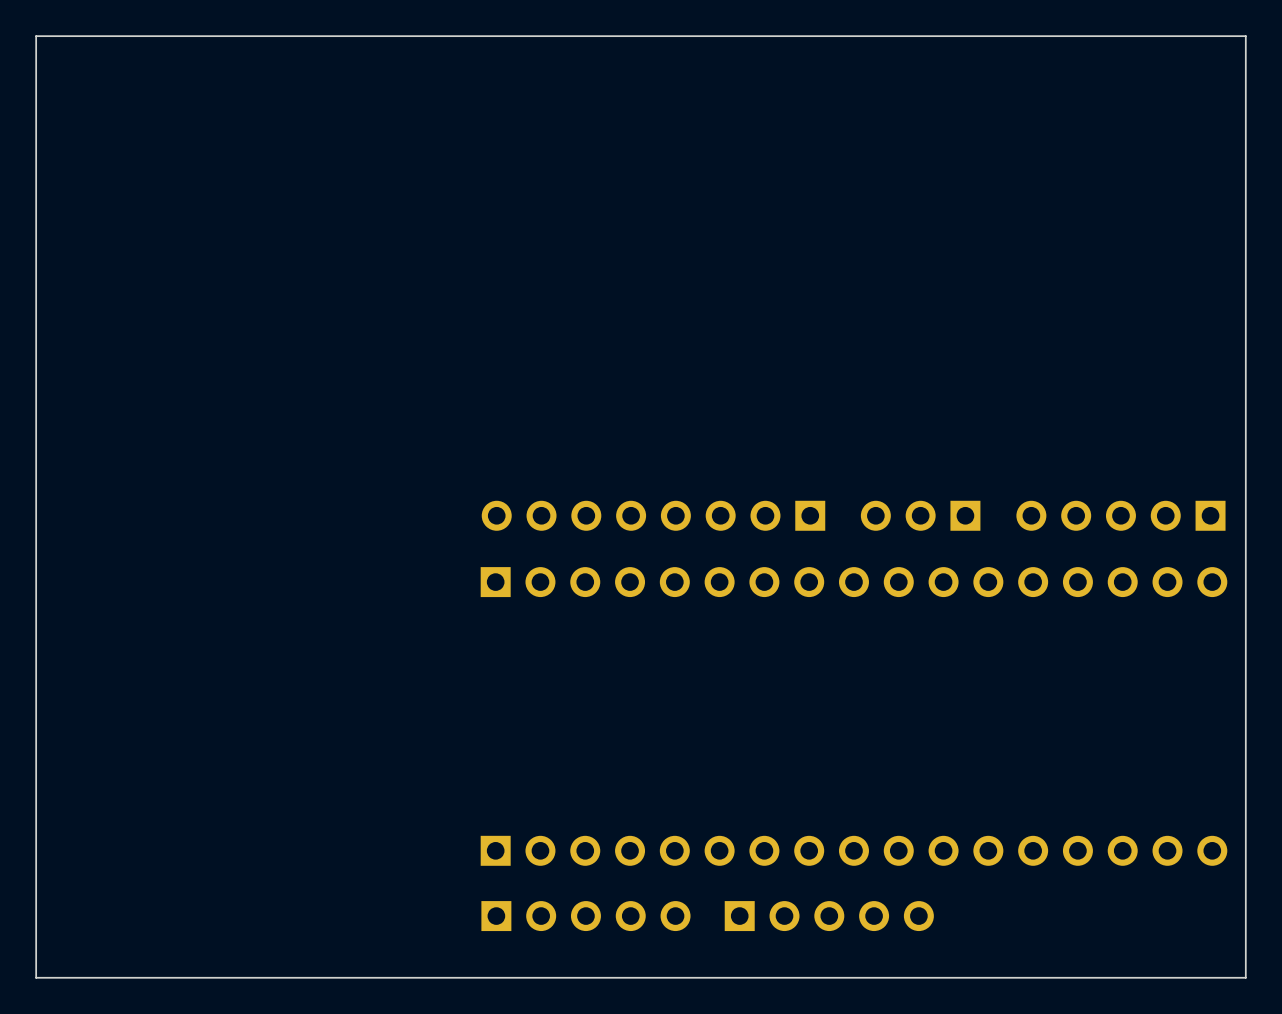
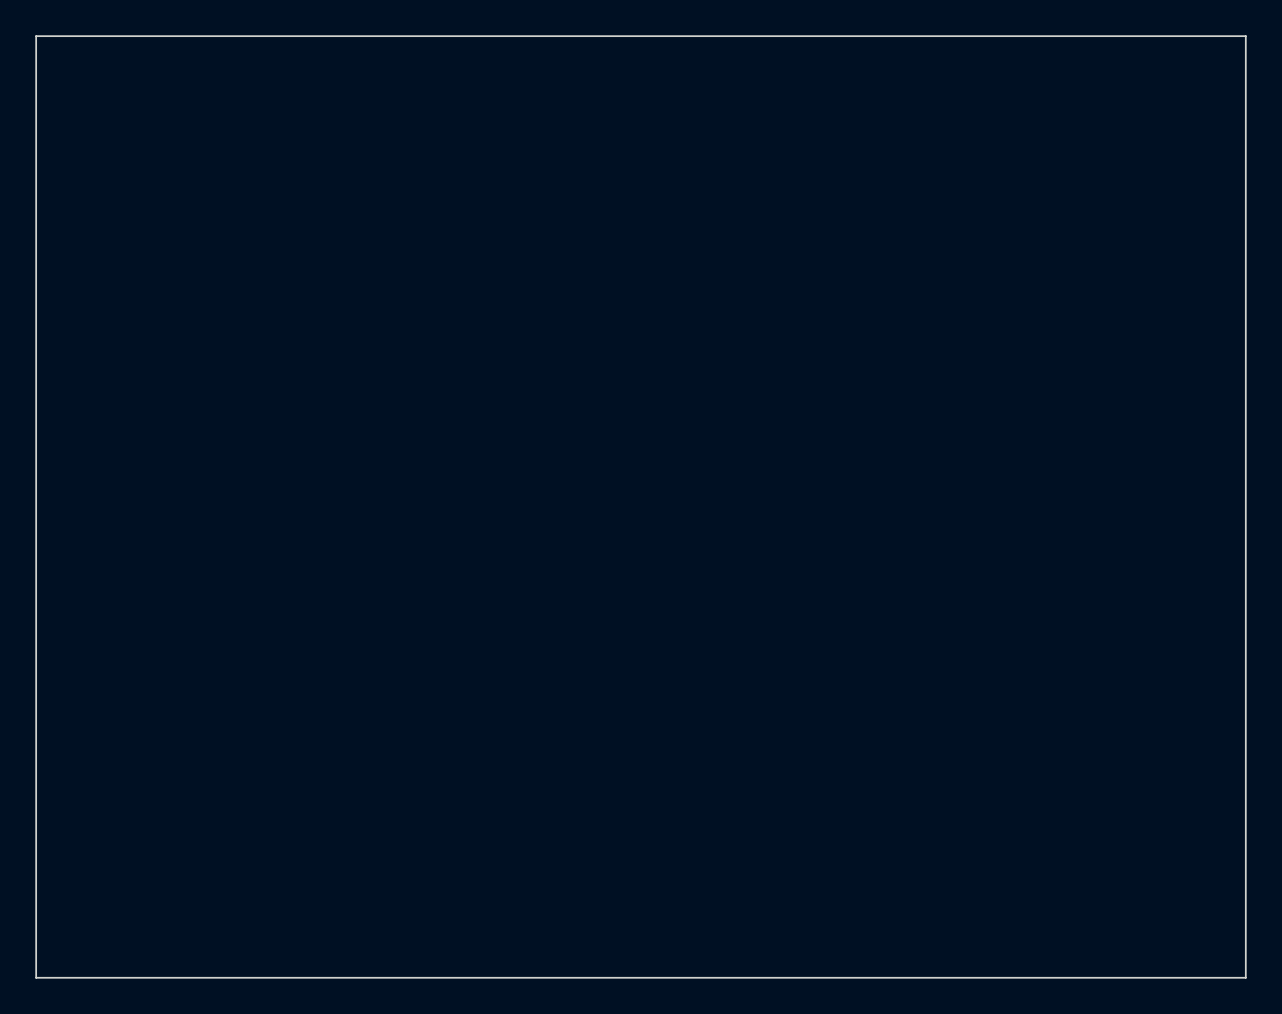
part: (653, 515) -> none
part: (920, 515) -> none
part: (1120, 515) -> none
part: (853, 582) -> none
part: (853, 850) -> none
part: (585, 916) -> none
part: (829, 916) -> none

